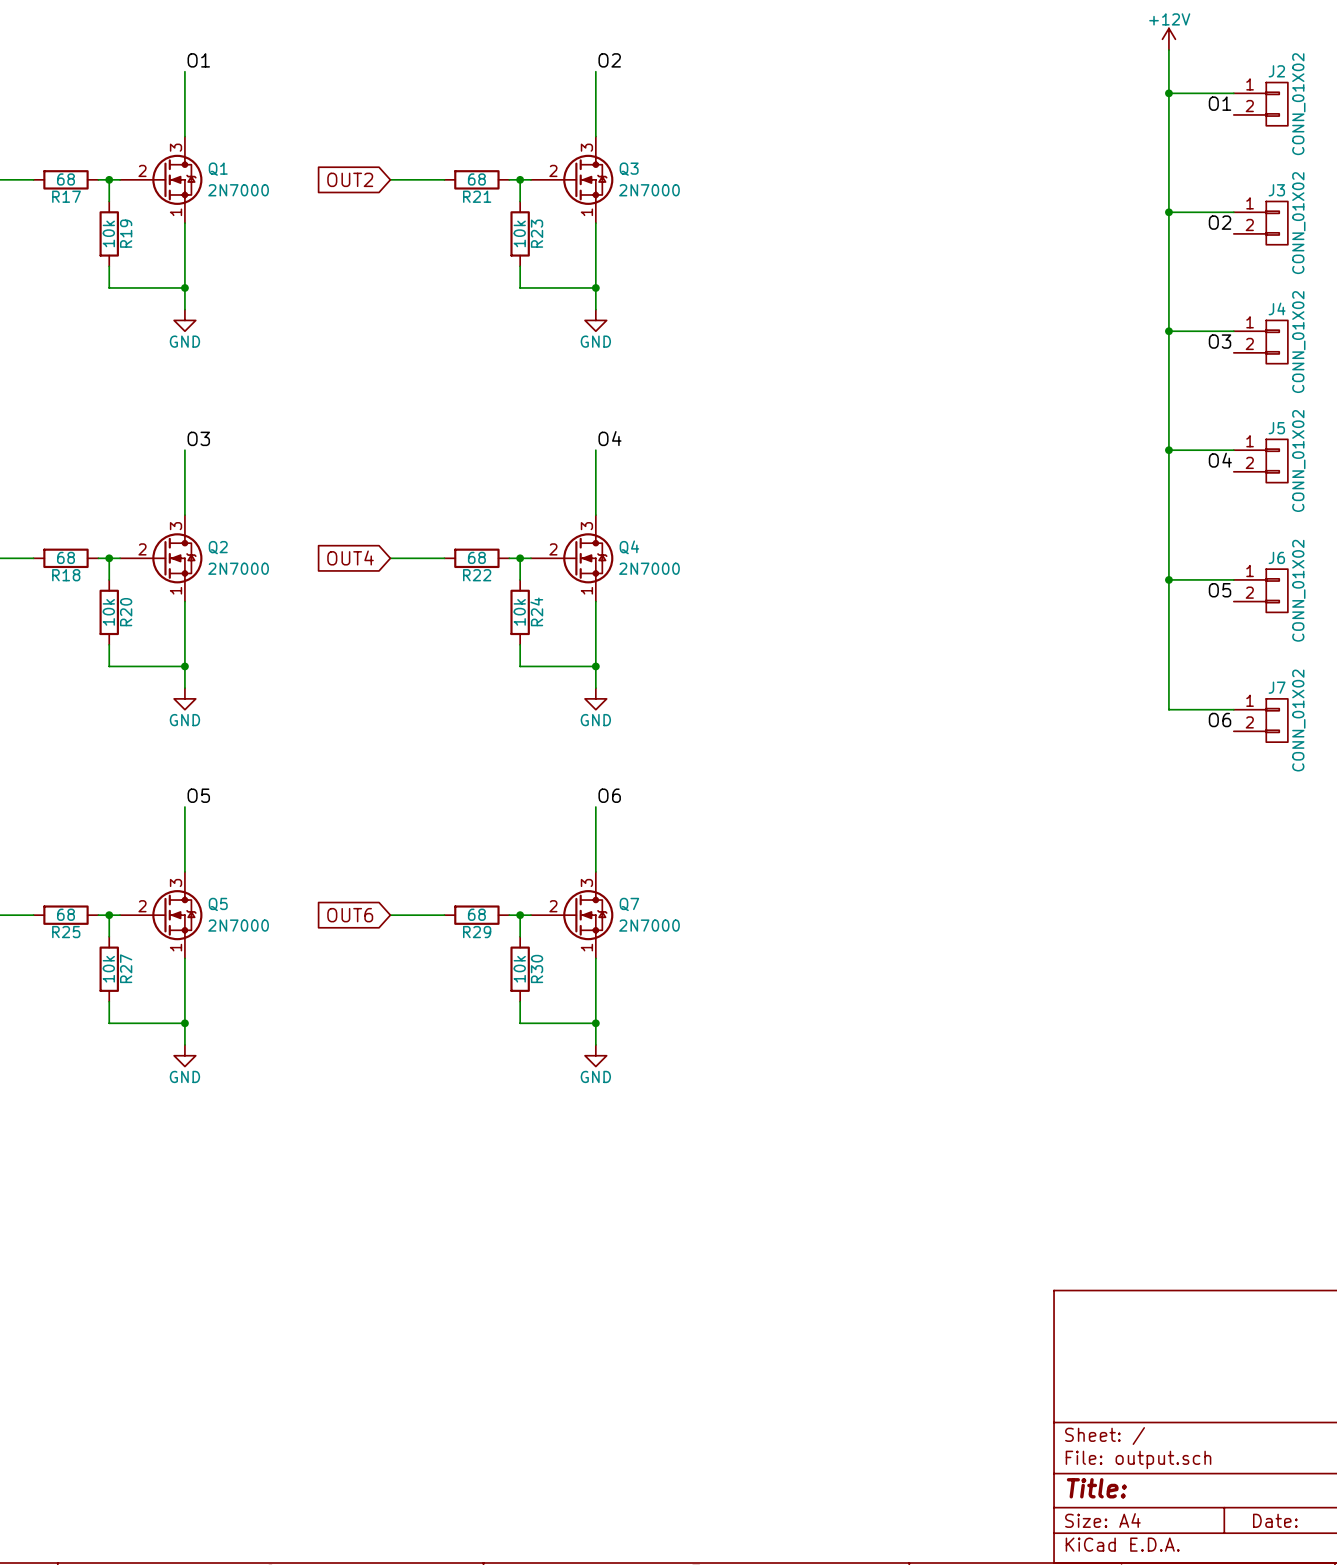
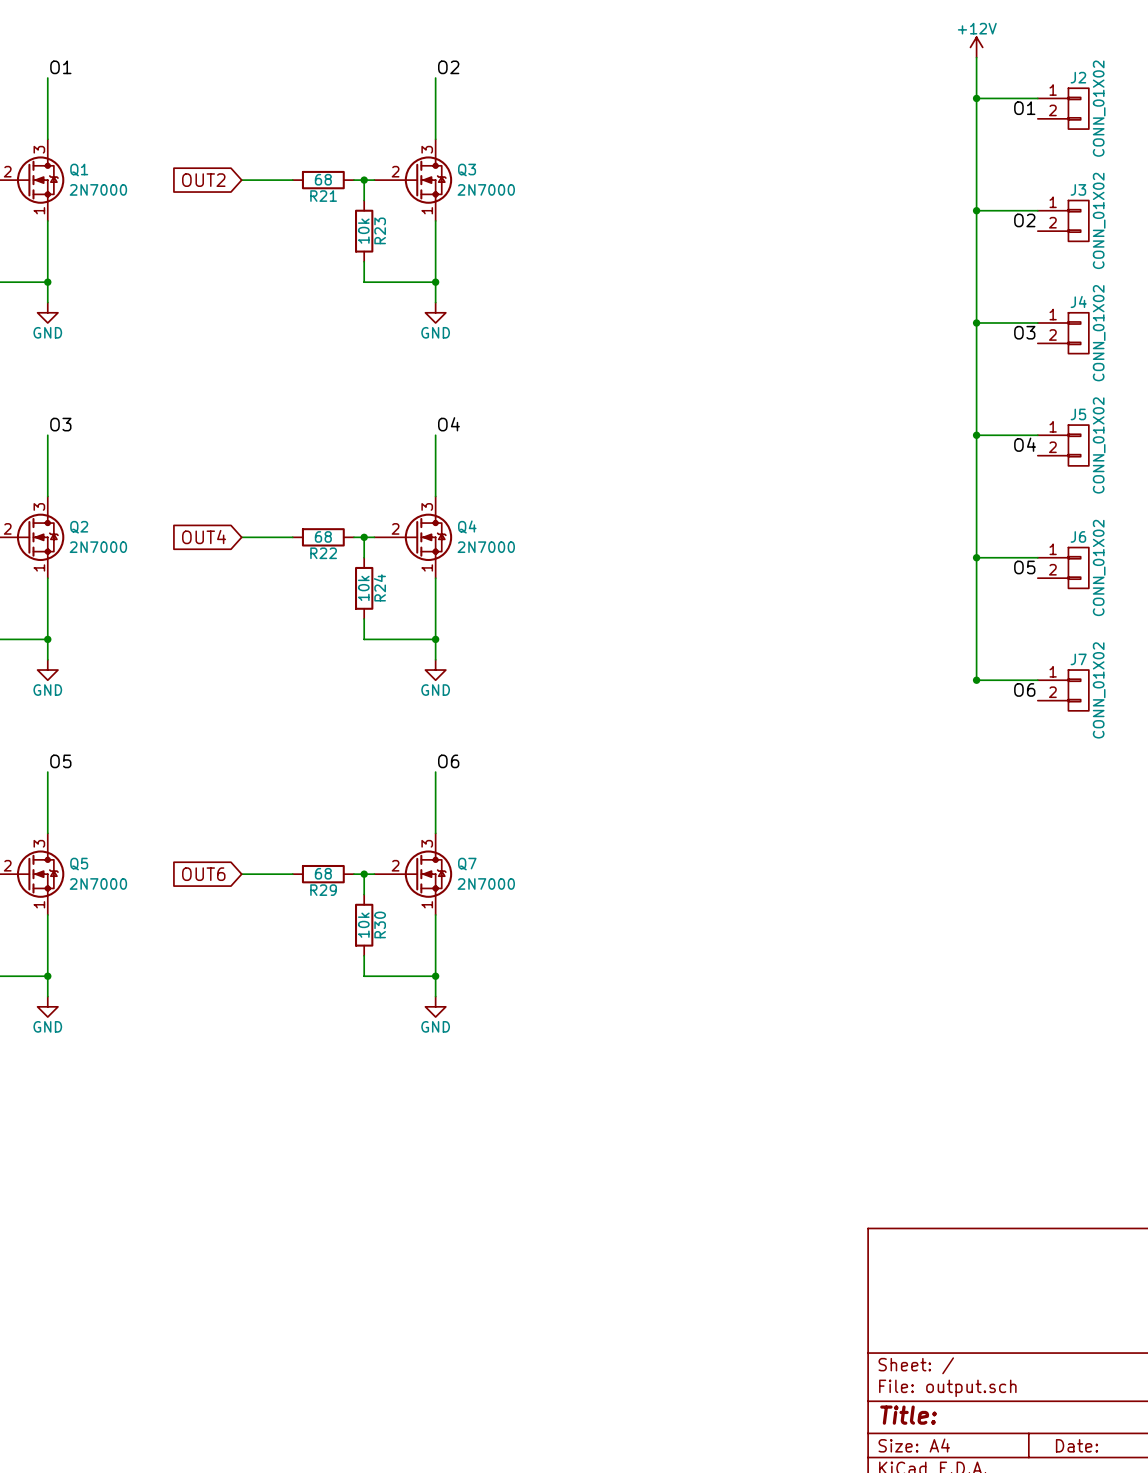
junction: none -> (976, 680)

